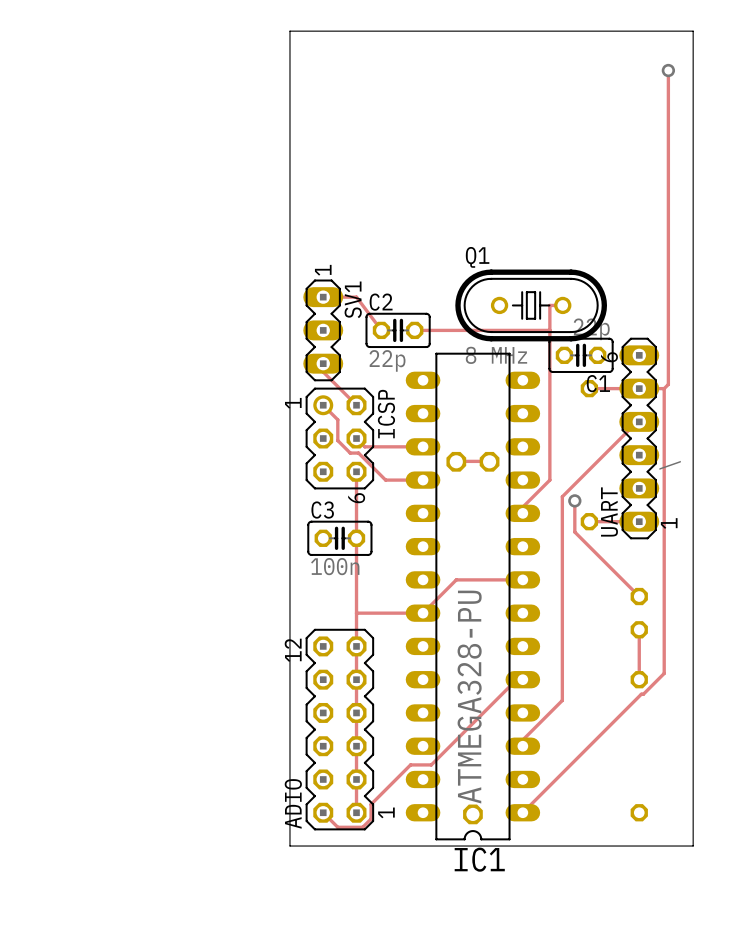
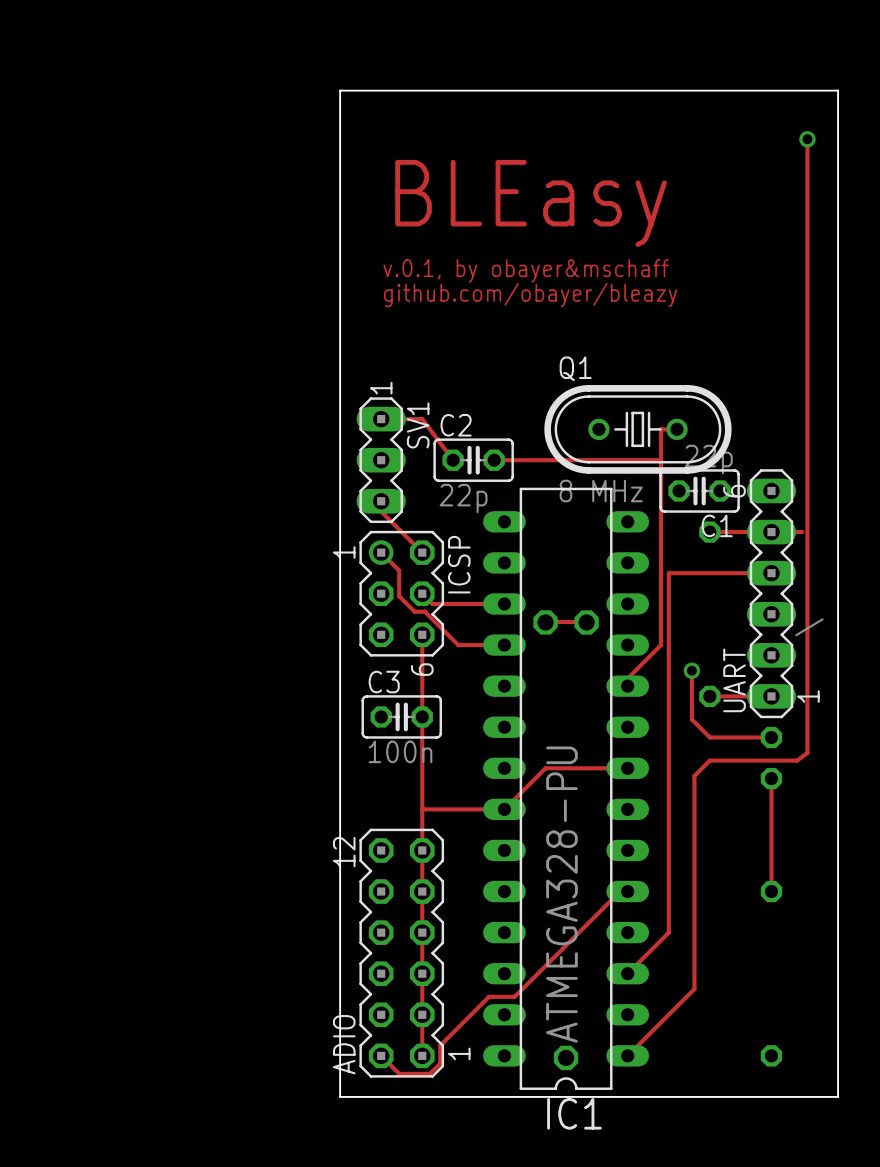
text: none -> BLEasy (531, 203)
text: none -> v.0.1, by obayer&mschaff (526, 270)
text: none -> github.com/obayer/bleazy (530, 295)
track: (668, 384) (664, 388) (664, 673) (576, 758) -> (807, 526) (807, 752) (797, 760) (709, 760) (694, 776) (694, 989)
track: (637, 421) (562, 496) (562, 700) (522, 739) (522, 746) -> (768, 573) (668, 573) (668, 932) (627, 973)
track: (574, 532) (639, 596) -> (691, 709) (691, 719) (709, 737) (771, 737)
track: none -> (771, 778) (771, 829)
part position: (639, 613) -> (771, 758)

